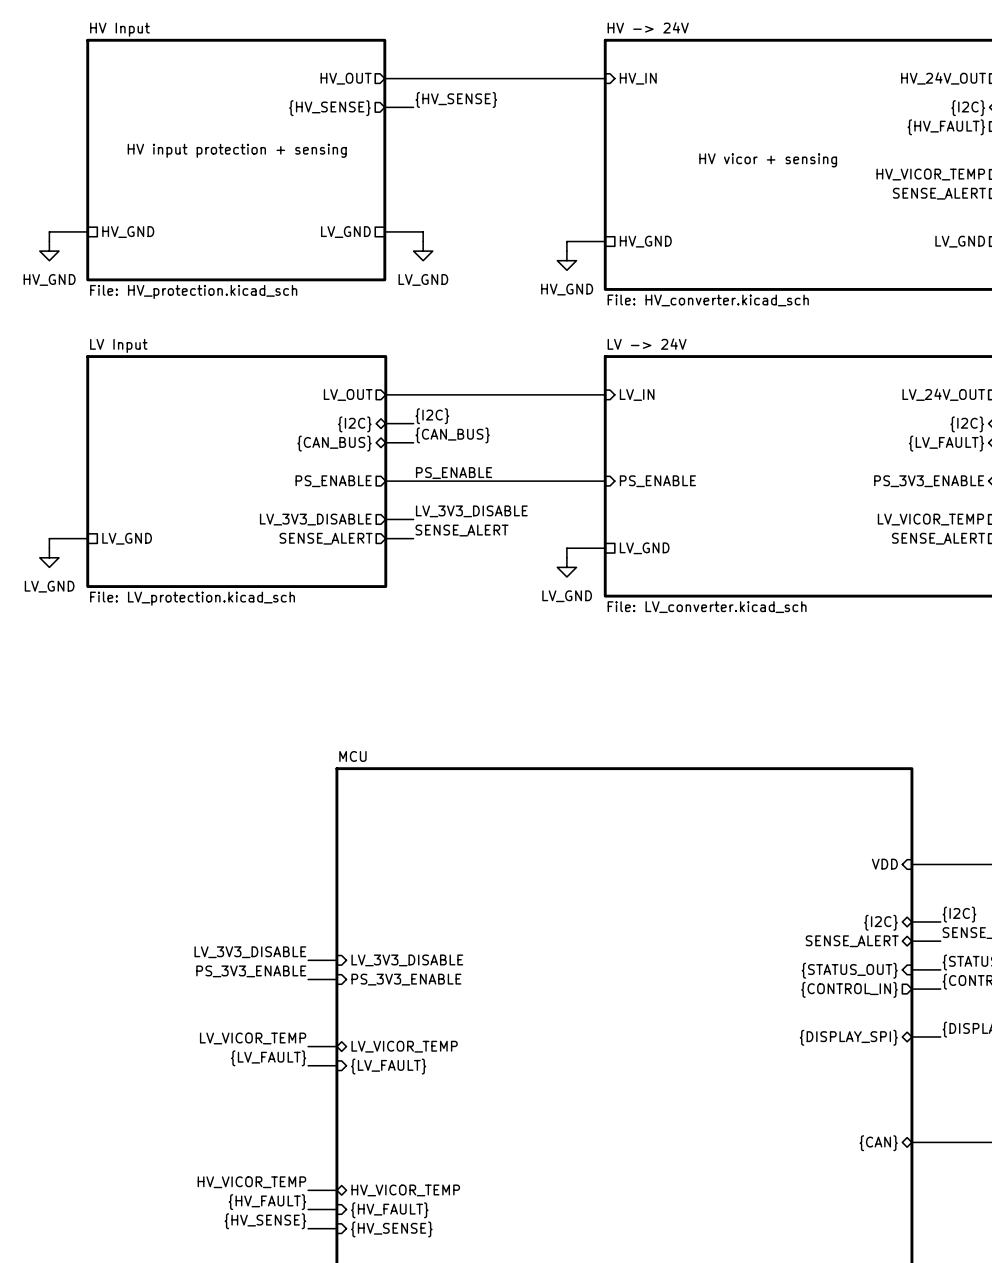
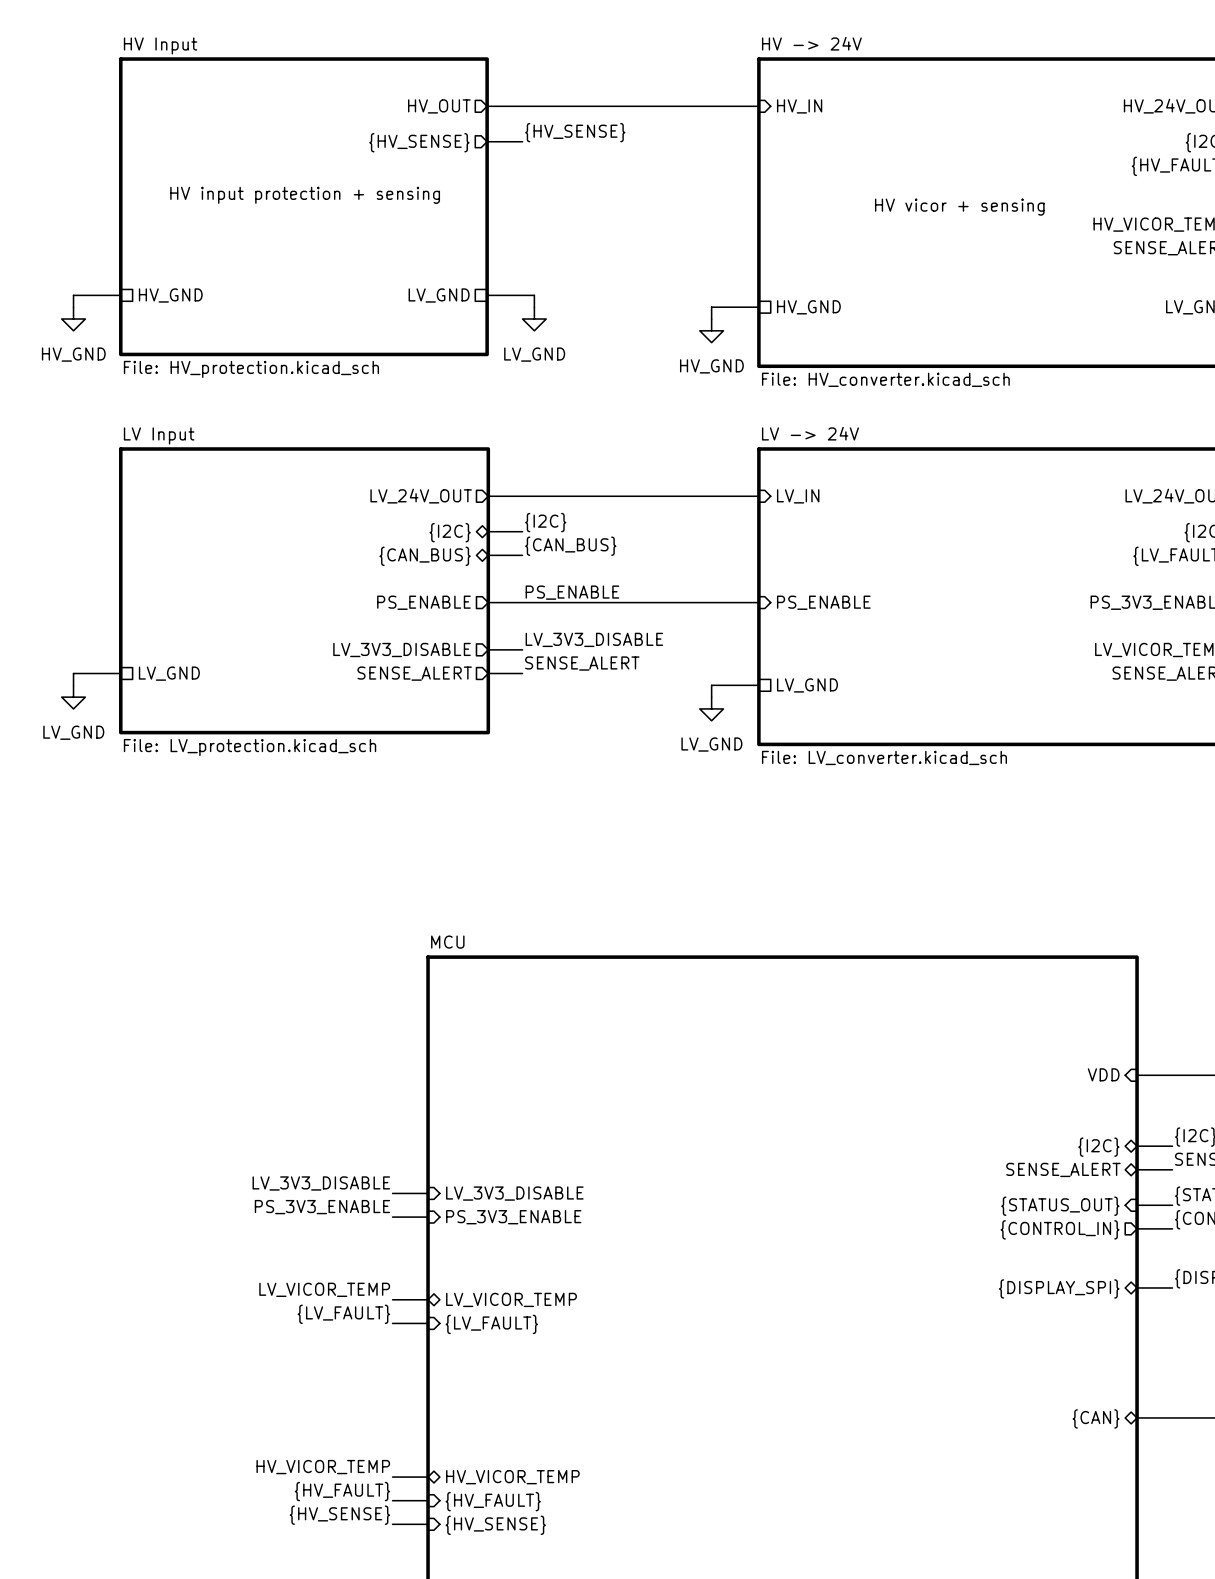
sheet pin: LV_OUT (348, 394) -> LV_24V_OUT (421, 496)

